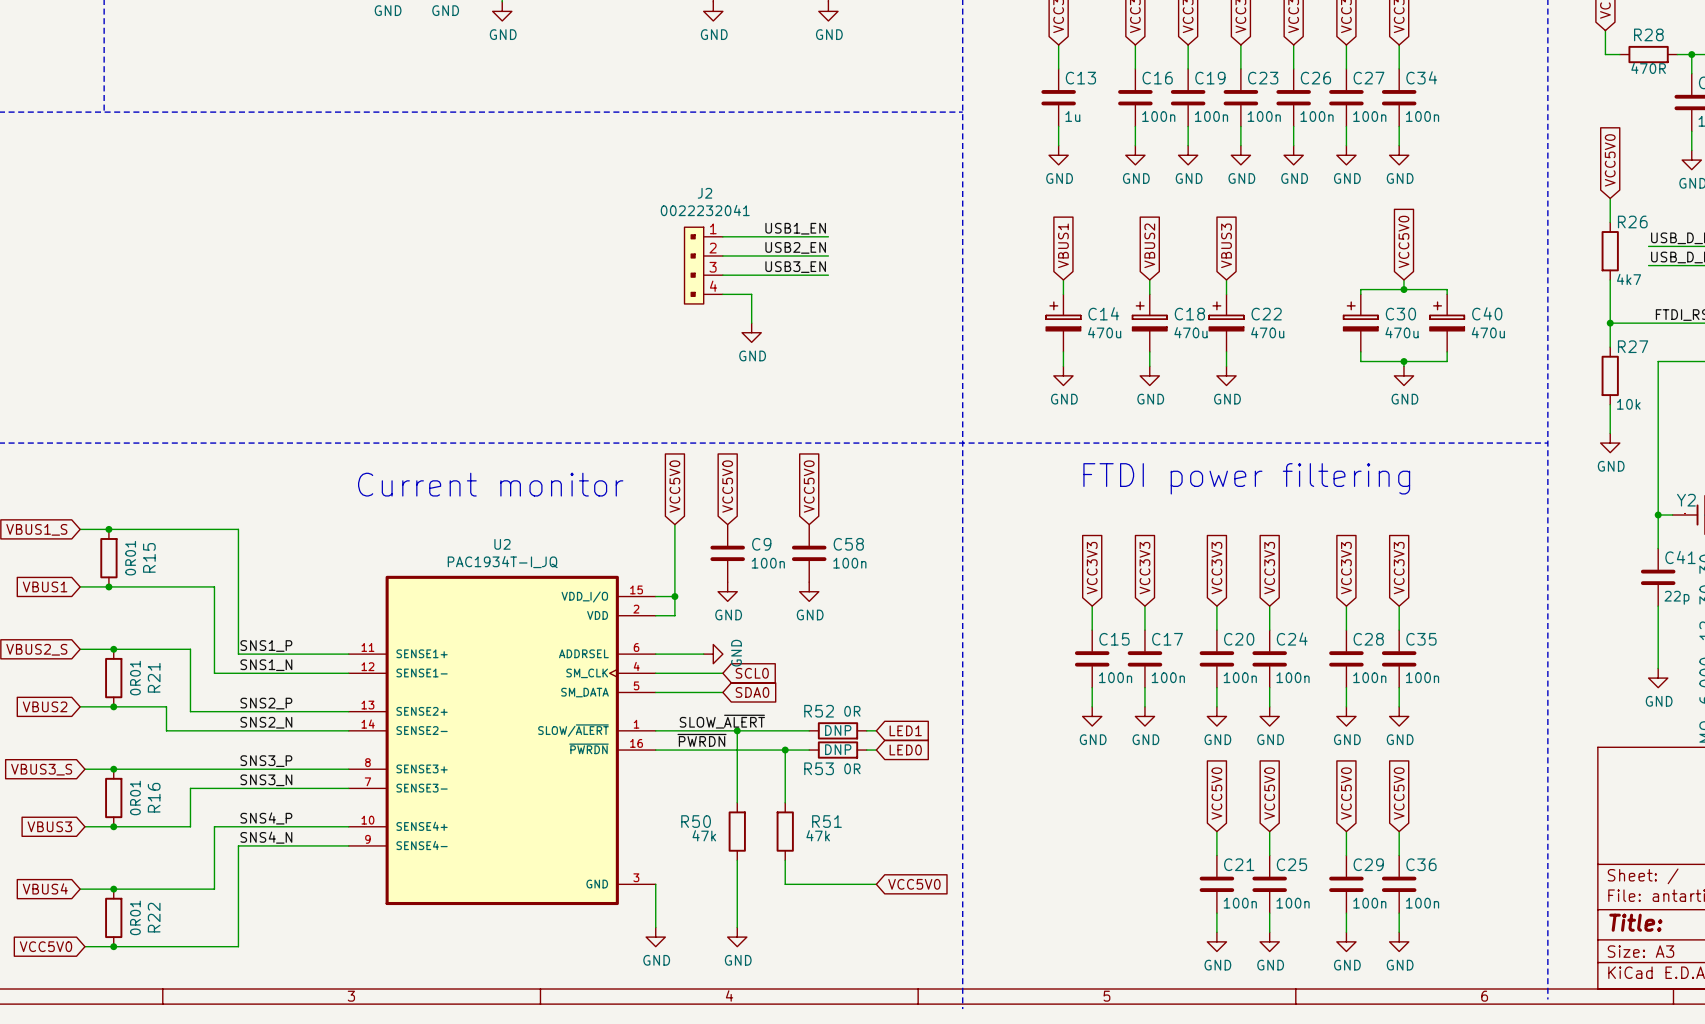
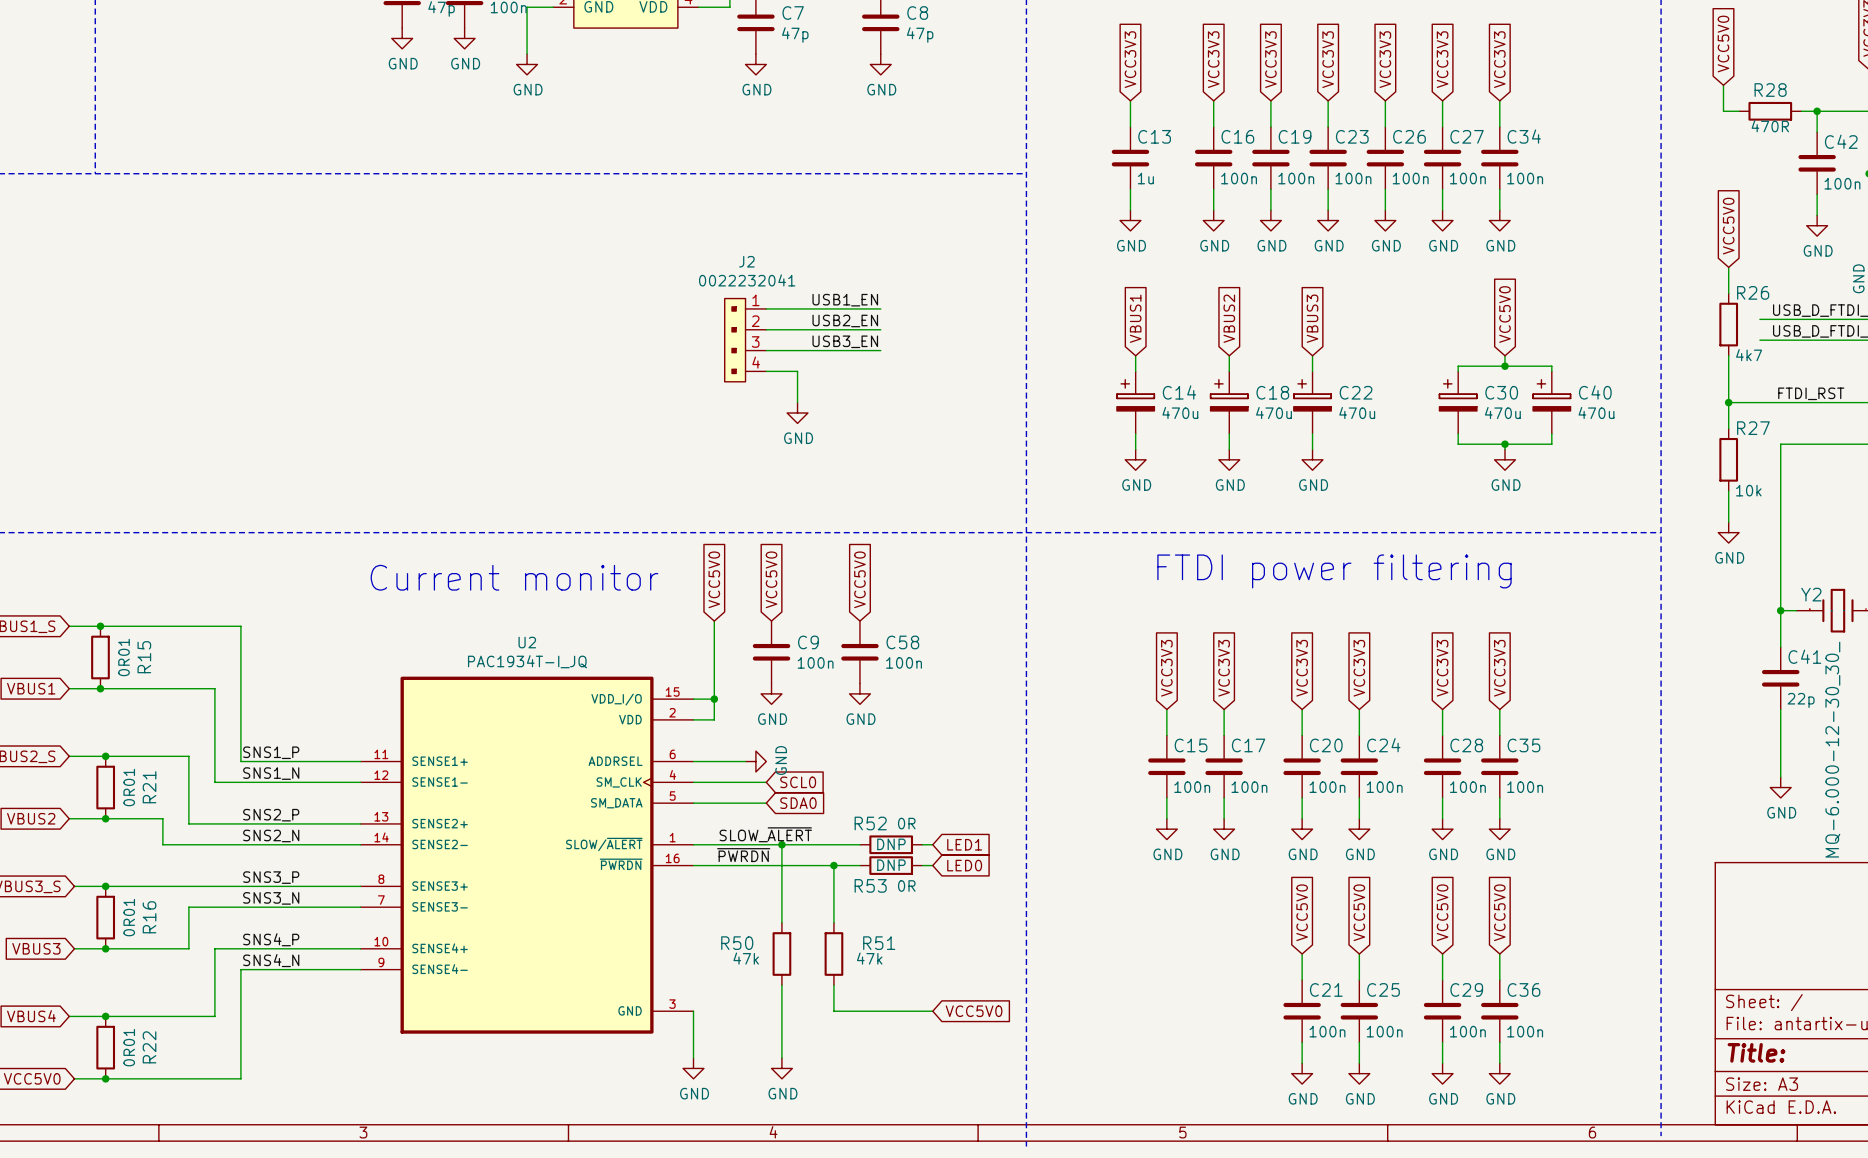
wire: none -> (1759, 319) (1770, 319)
wire: none -> (1759, 340) (1770, 340)

